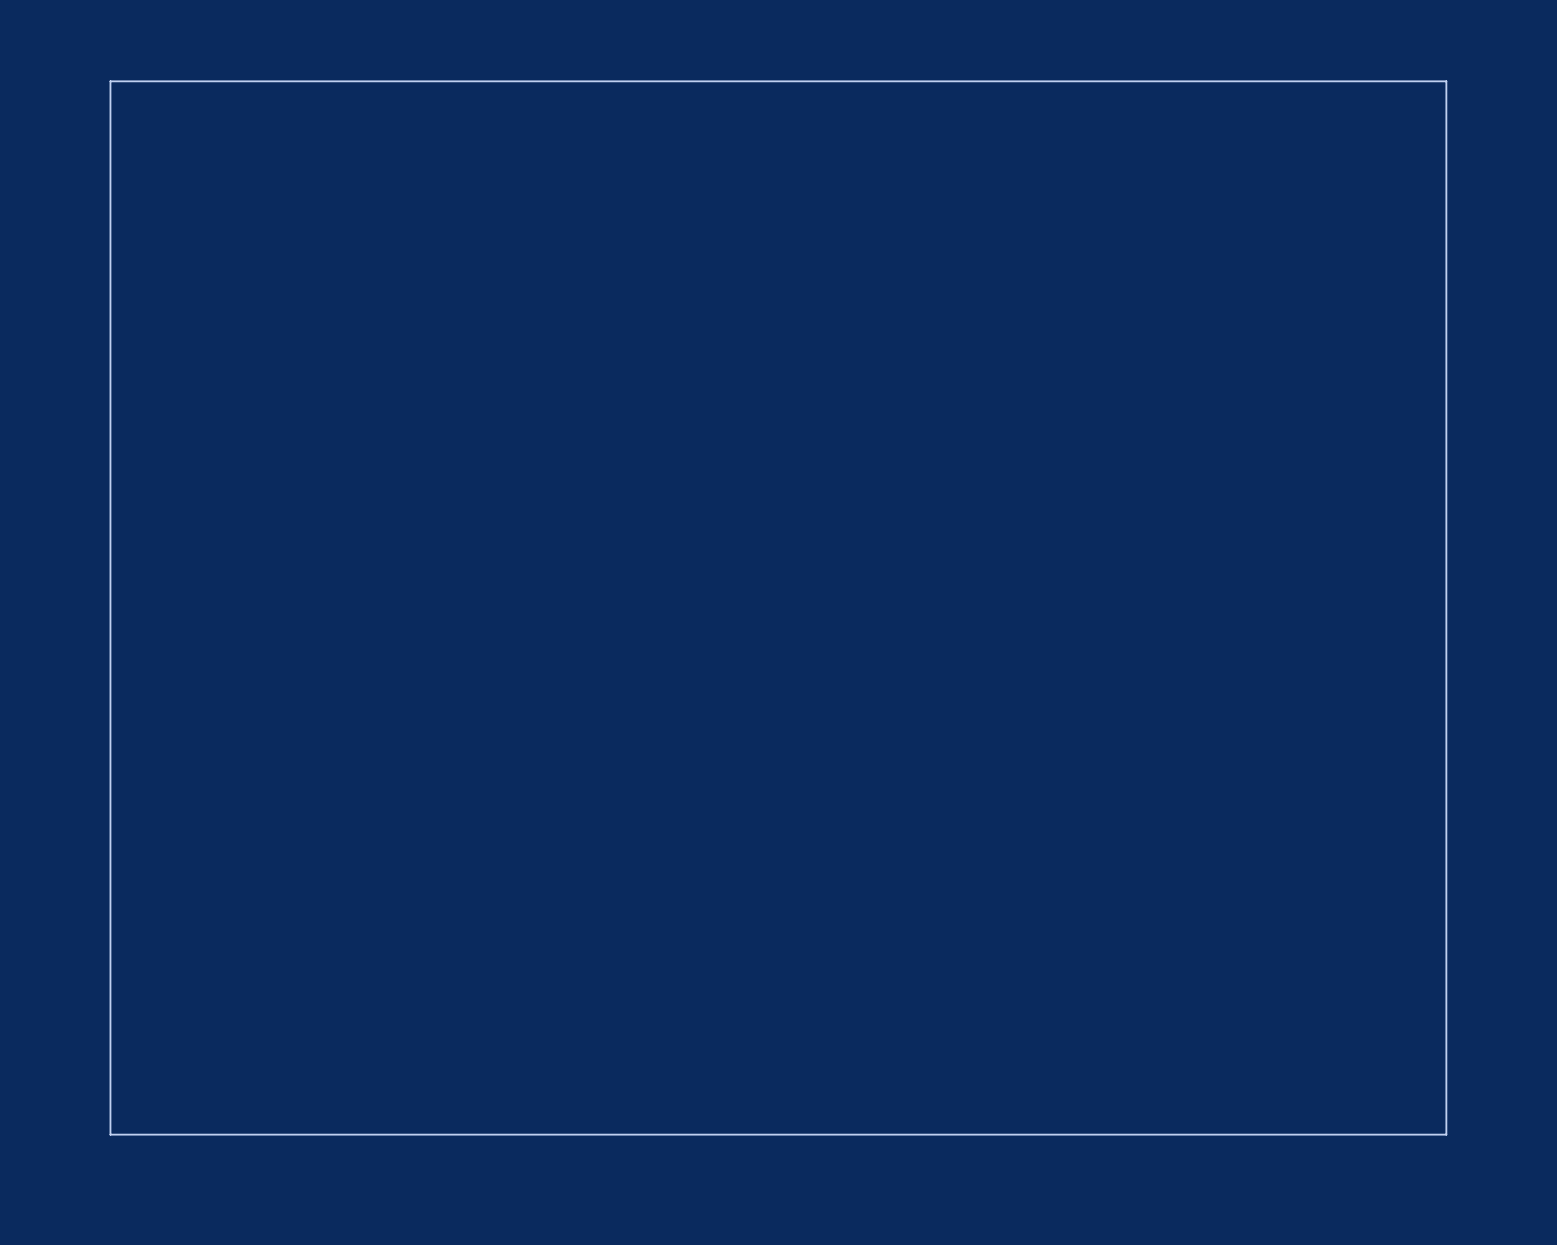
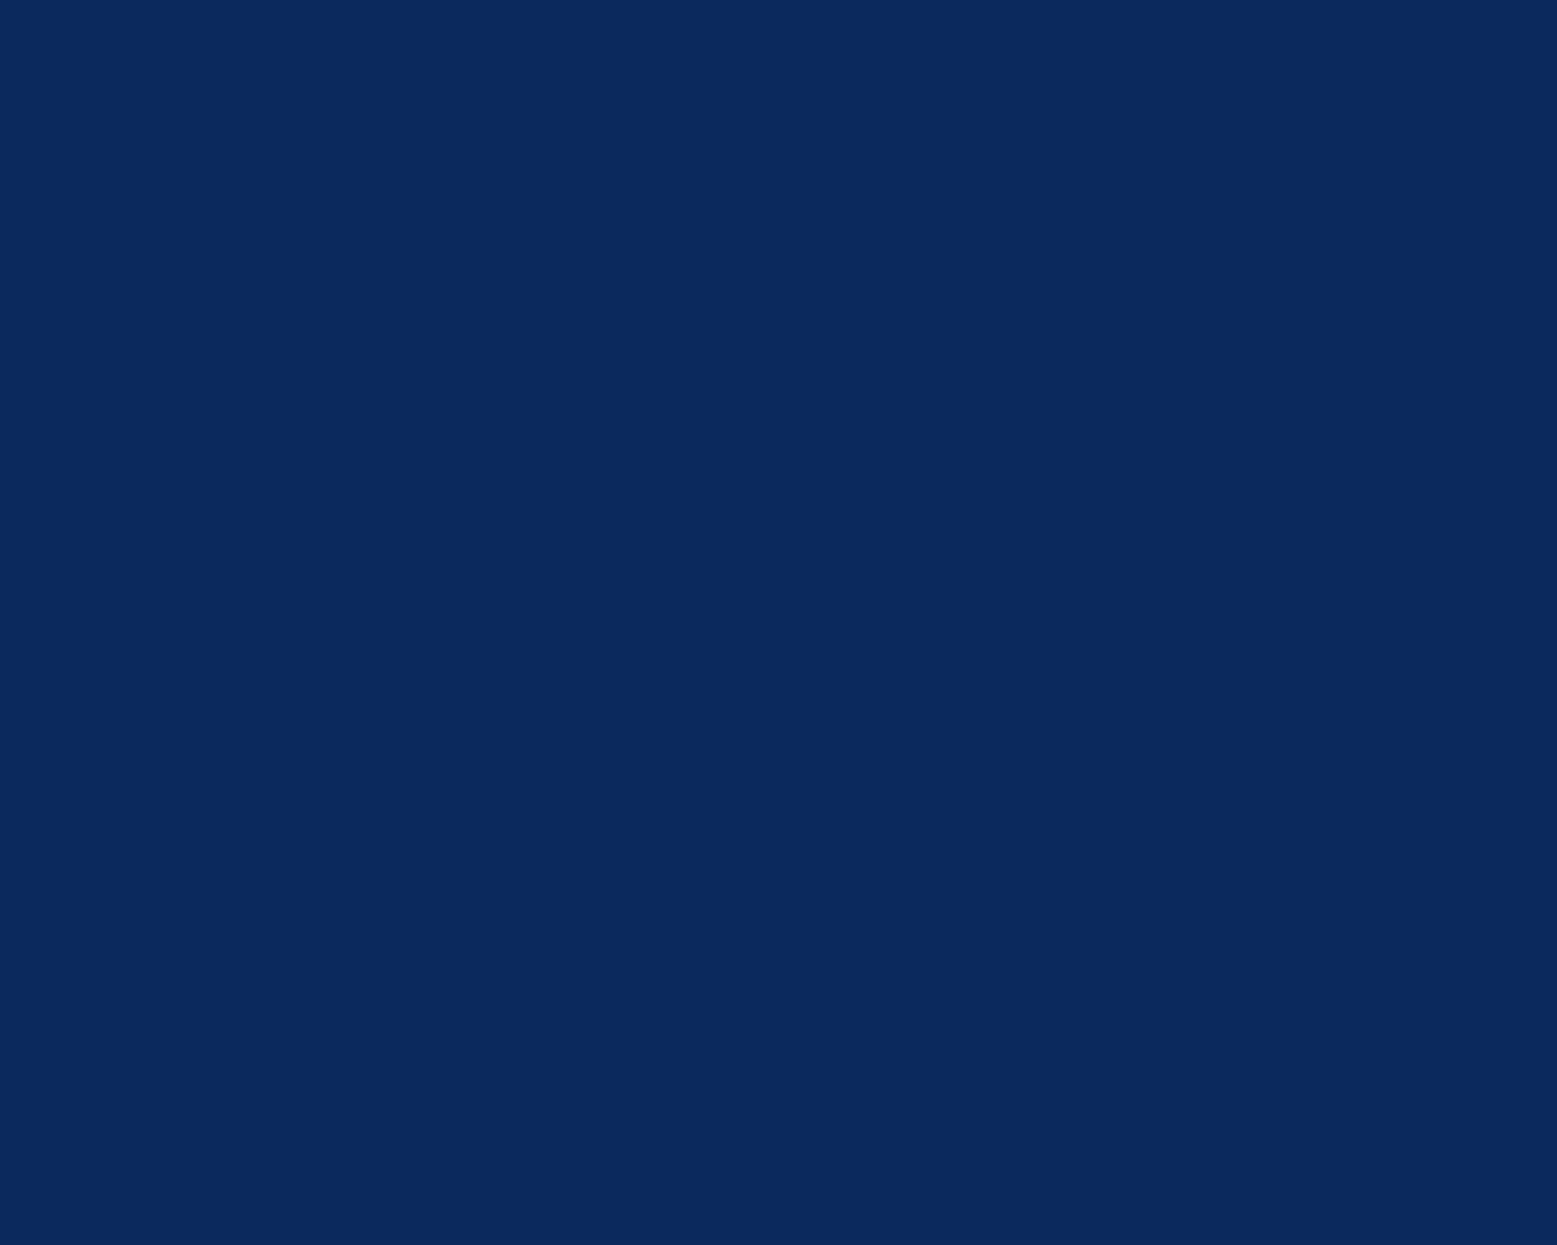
board edge: (1446, 81) (110, 81) (110, 1134) (1446, 1134) (1446, 81) -> none

